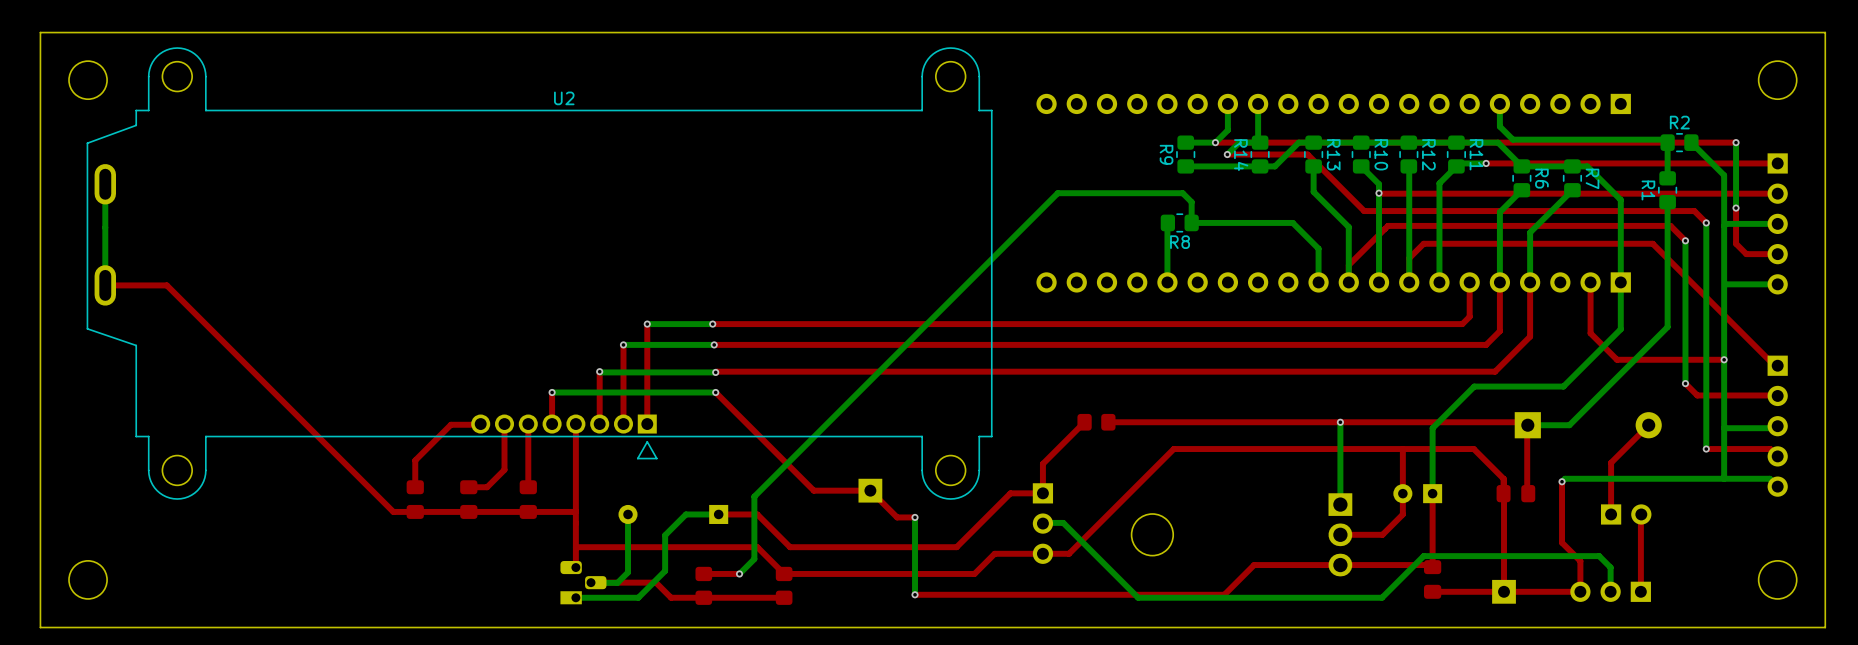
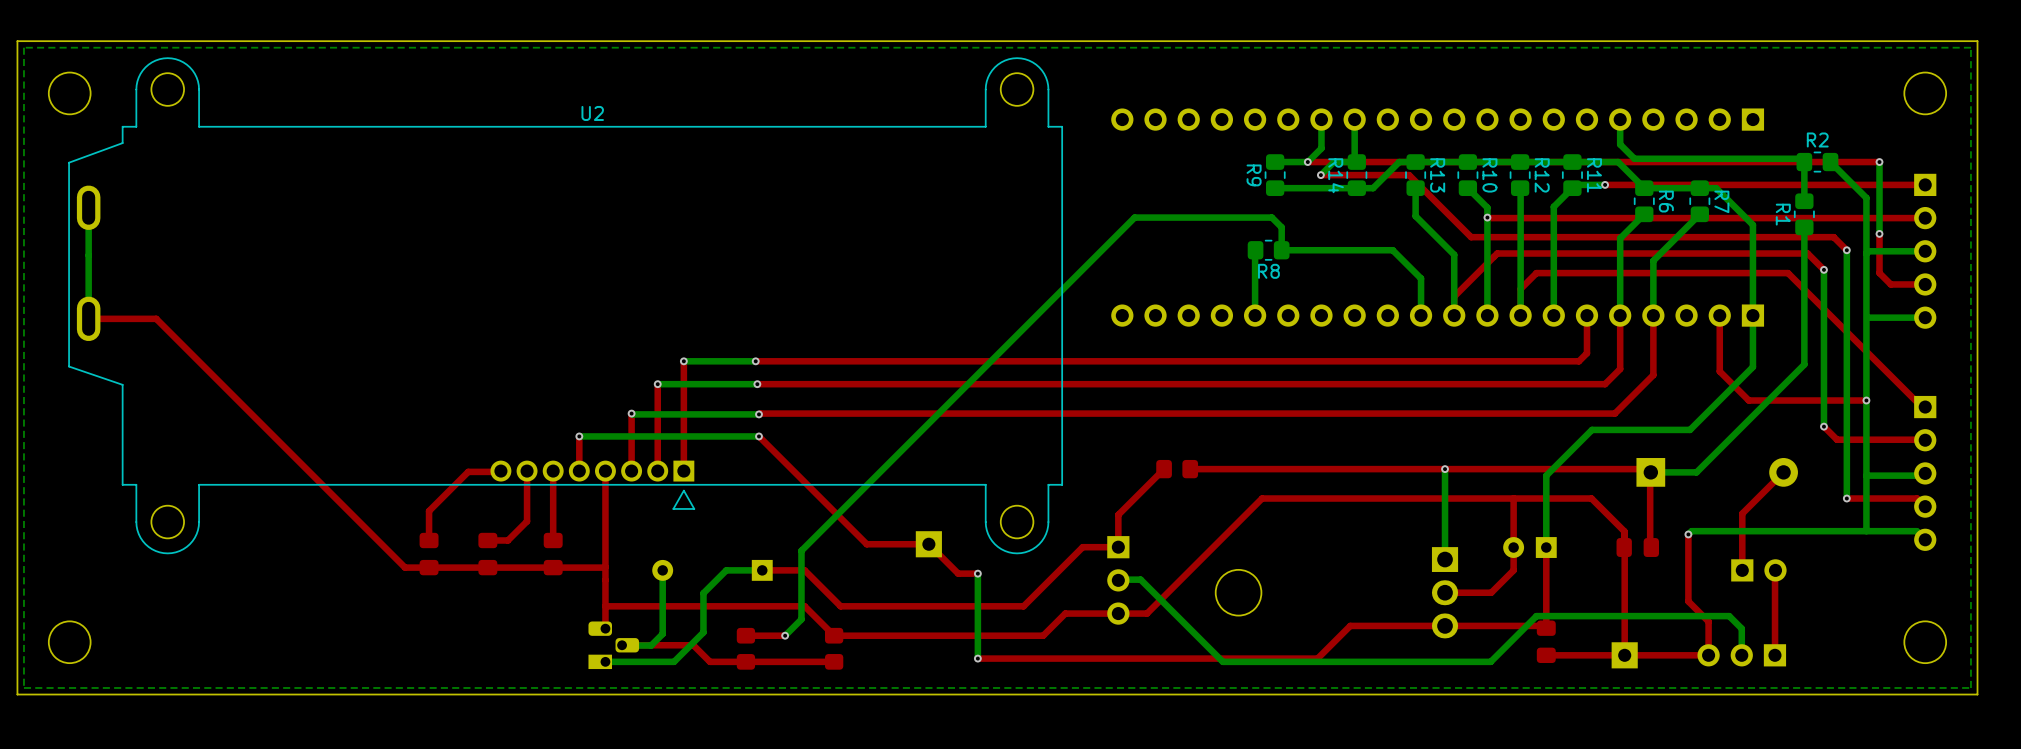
bottom zone outline: none -> (1970, 47) (23, 47) (23, 687) (1970, 687) (1970, 47)

